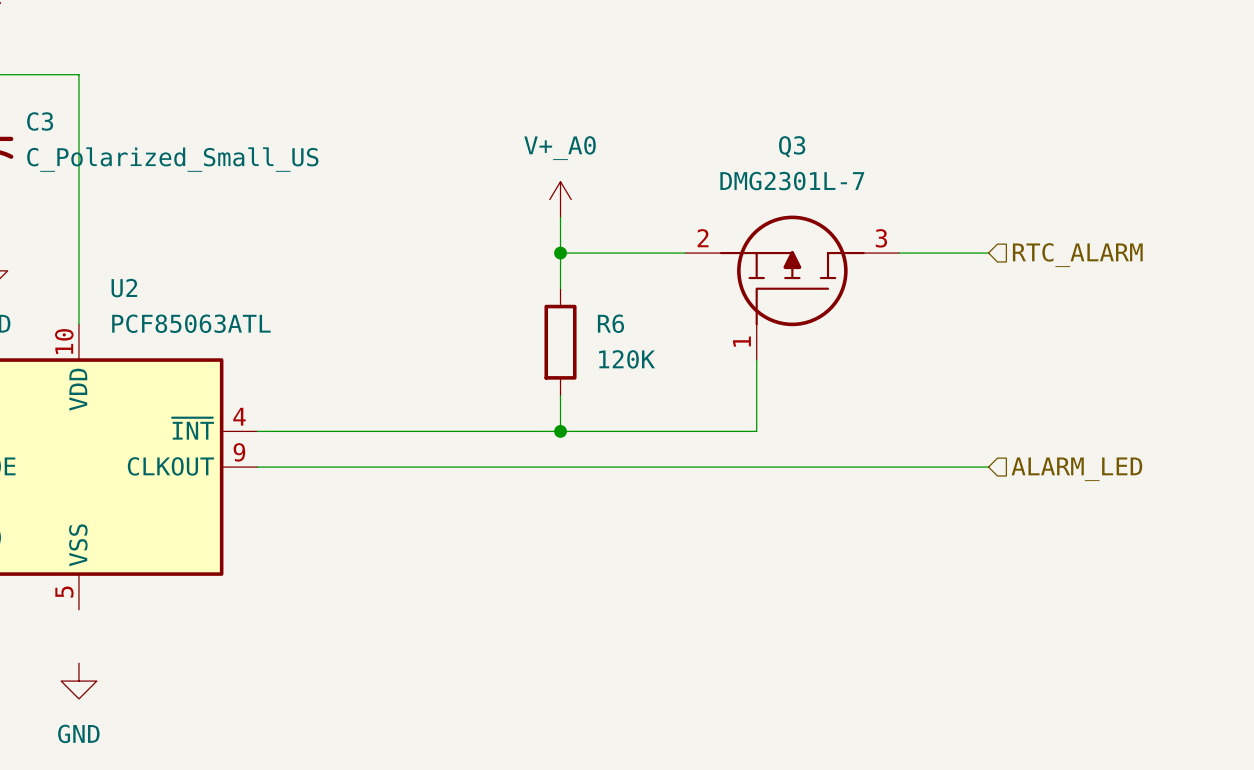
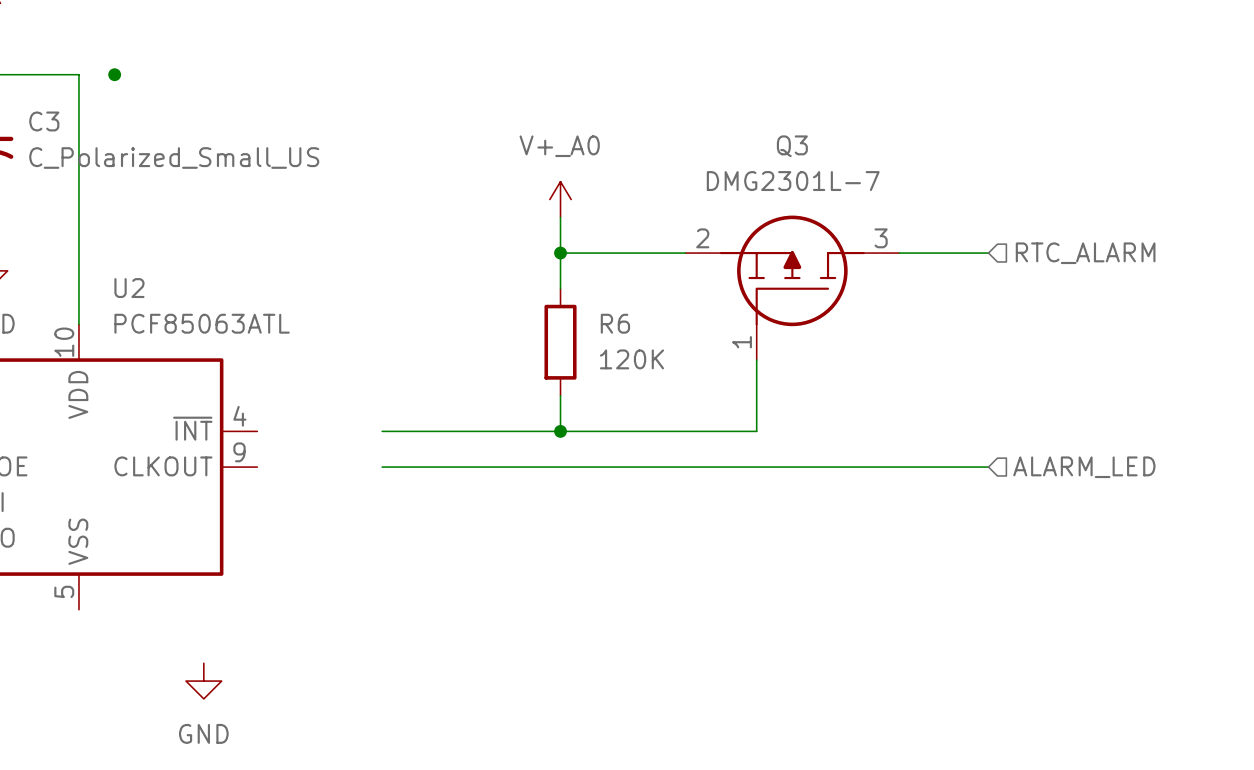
junction: none -> (114, 74)
wire: (257, 431) (382, 431) -> none
wire: (257, 467) (382, 467) -> none
power symbol position: GND (78, 681) -> GND (203, 681)

